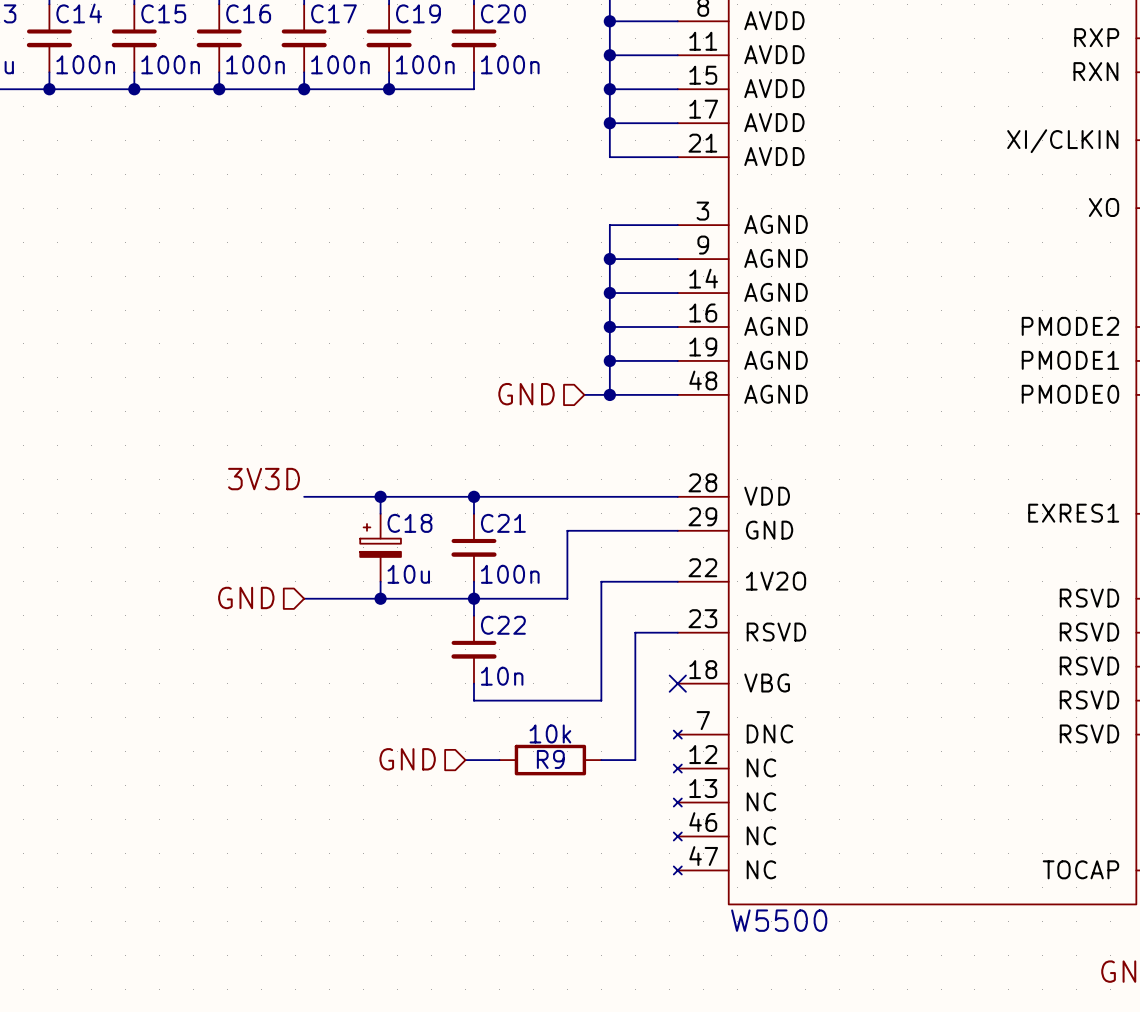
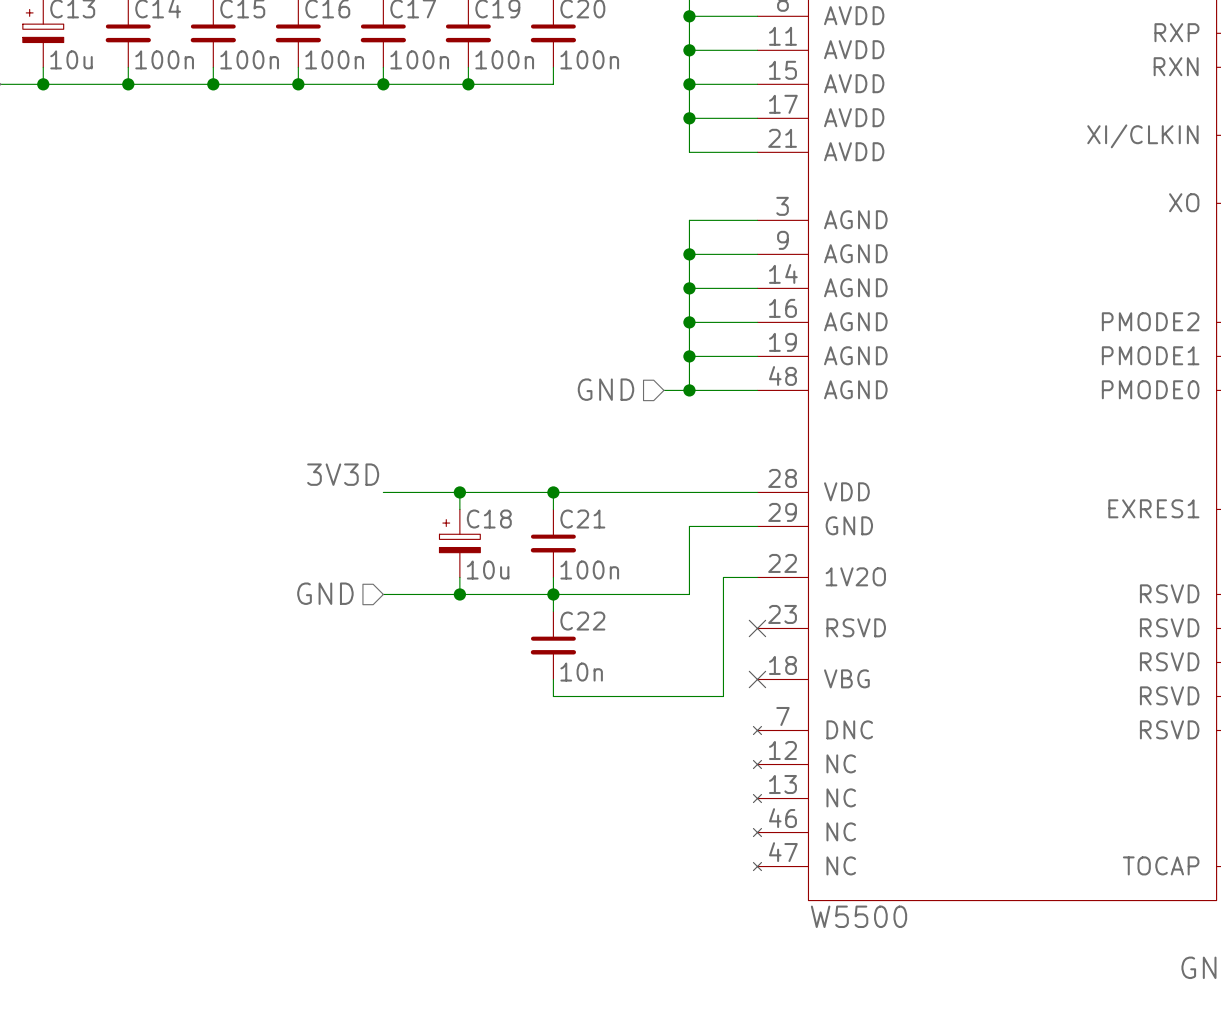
wire: (609, 530) (567, 530) (567, 598) -> (689, 526) (689, 594) (646, 594)
wire: (643, 581) (601, 581) (601, 700) -> (723, 577) (723, 696) (680, 696)
wire: (677, 632) (635, 632) (635, 760) (601, 760) -> none
no-connect mark: none -> (757, 628)
hierarchical label: GND (407, 759) -> none
wire: (465, 760) (499, 760) -> none
R9: 10k (550, 760) -> none

